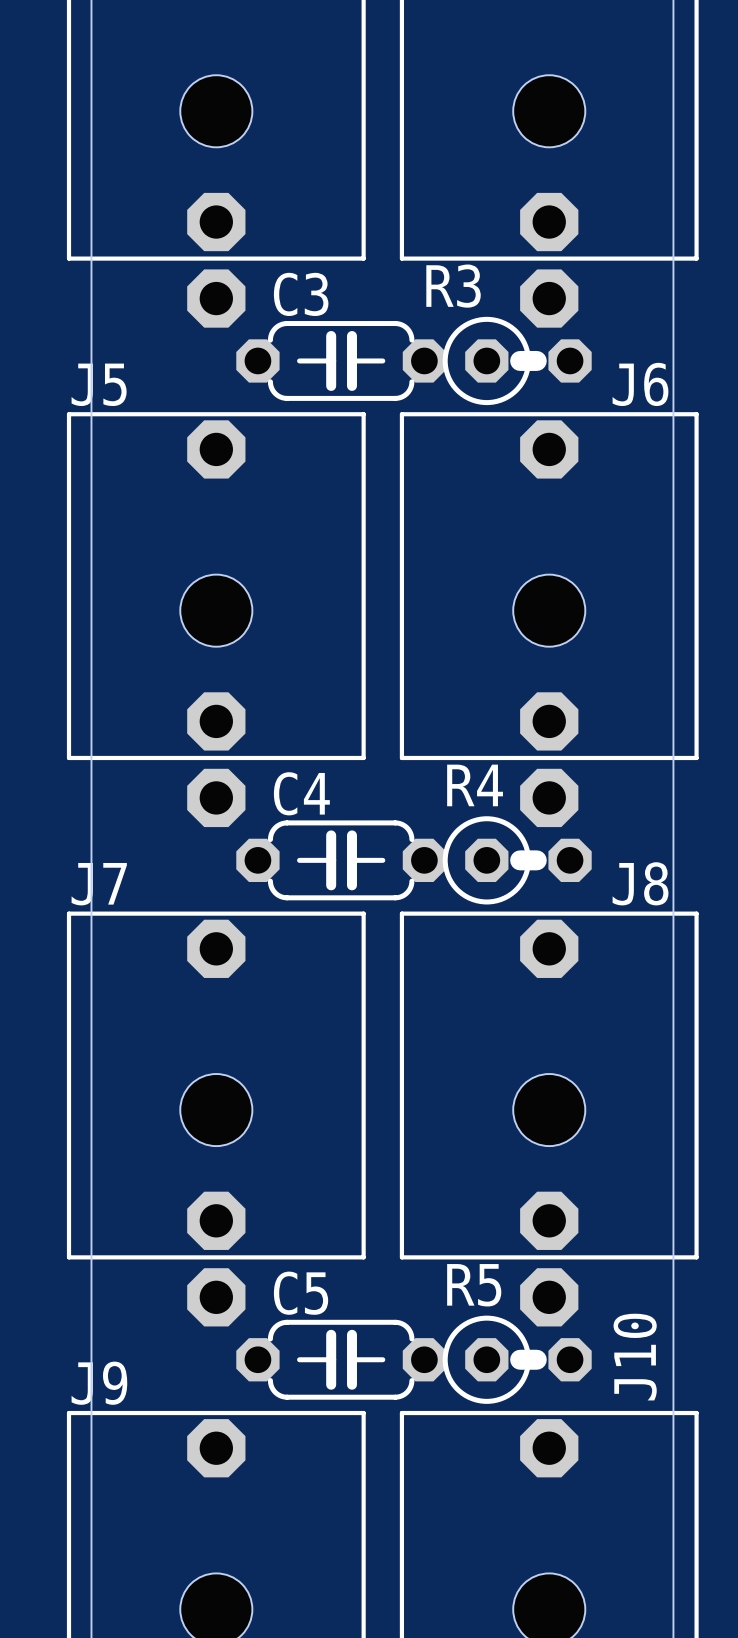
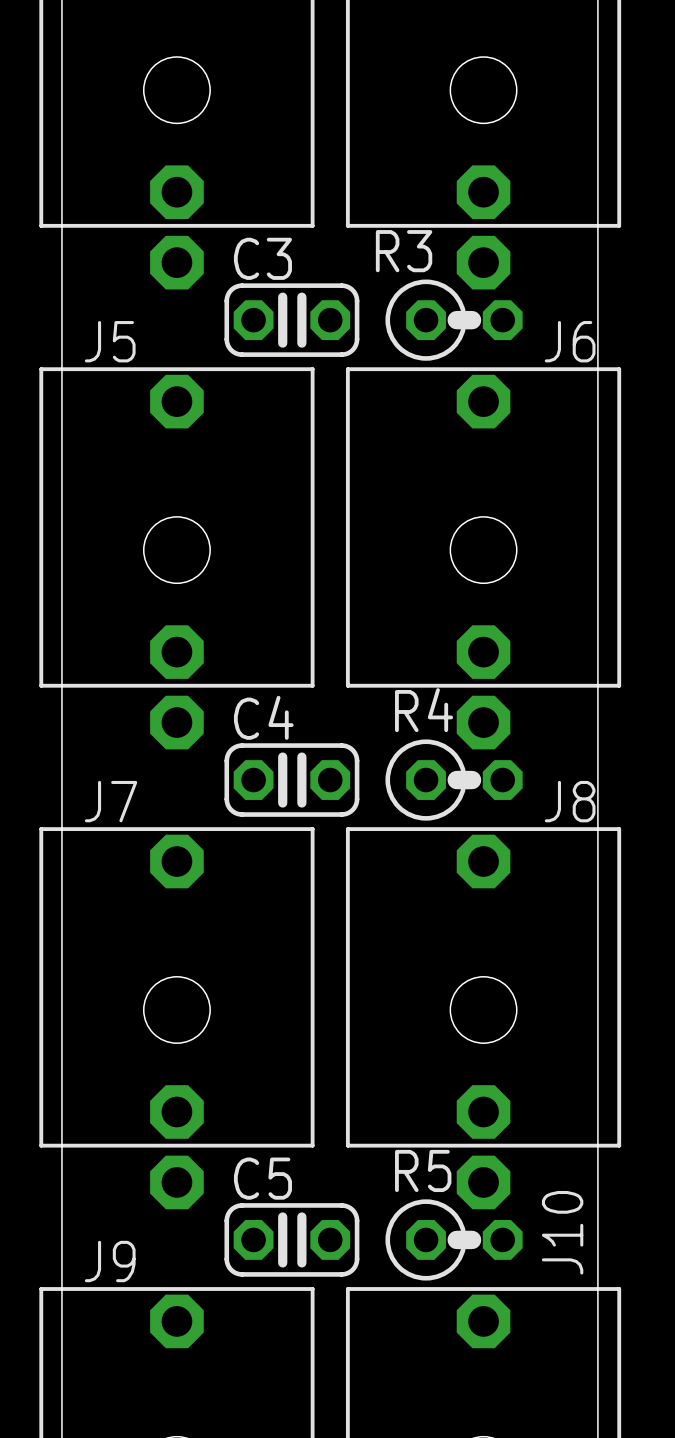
C3 footprint: [236, 321, 447, 401] -> [224, 283, 360, 357]
J5 name position: J5 (99, 384) -> J5 (110, 341)
C4 footprint: [236, 820, 447, 901] -> [224, 743, 360, 817]
J7 name position: J7 (99, 884) -> J7 (111, 801)
C5 footprint: [236, 1319, 447, 1400] -> [224, 1203, 360, 1277]
J9 name position: J9 (99, 1383) -> J9 (110, 1261)

